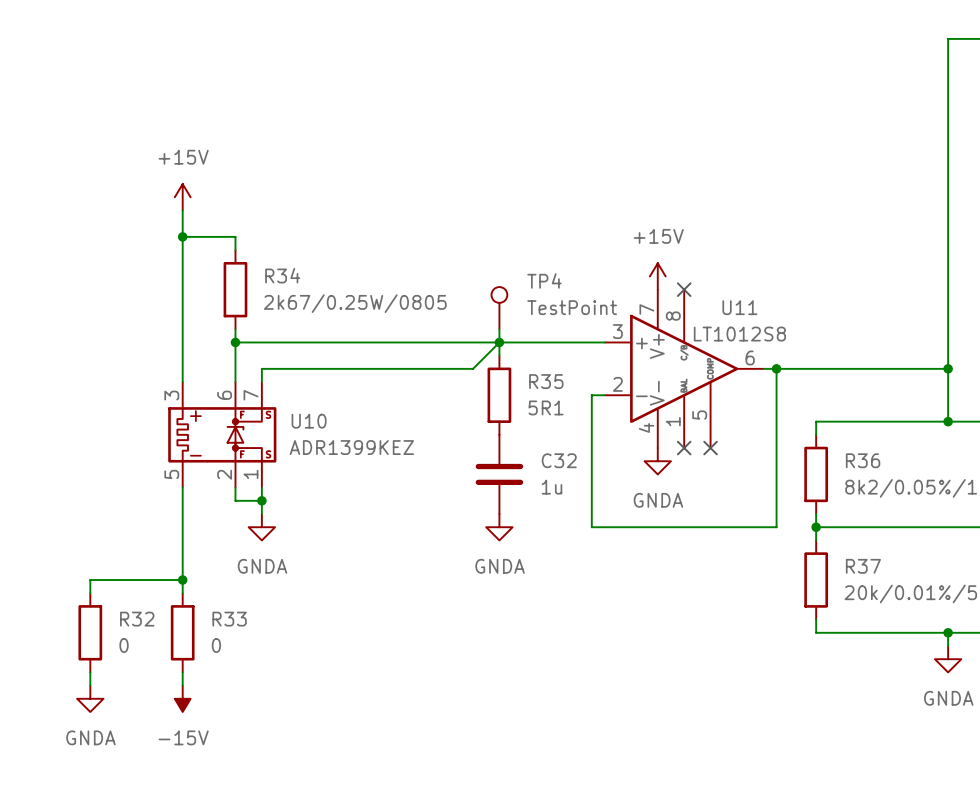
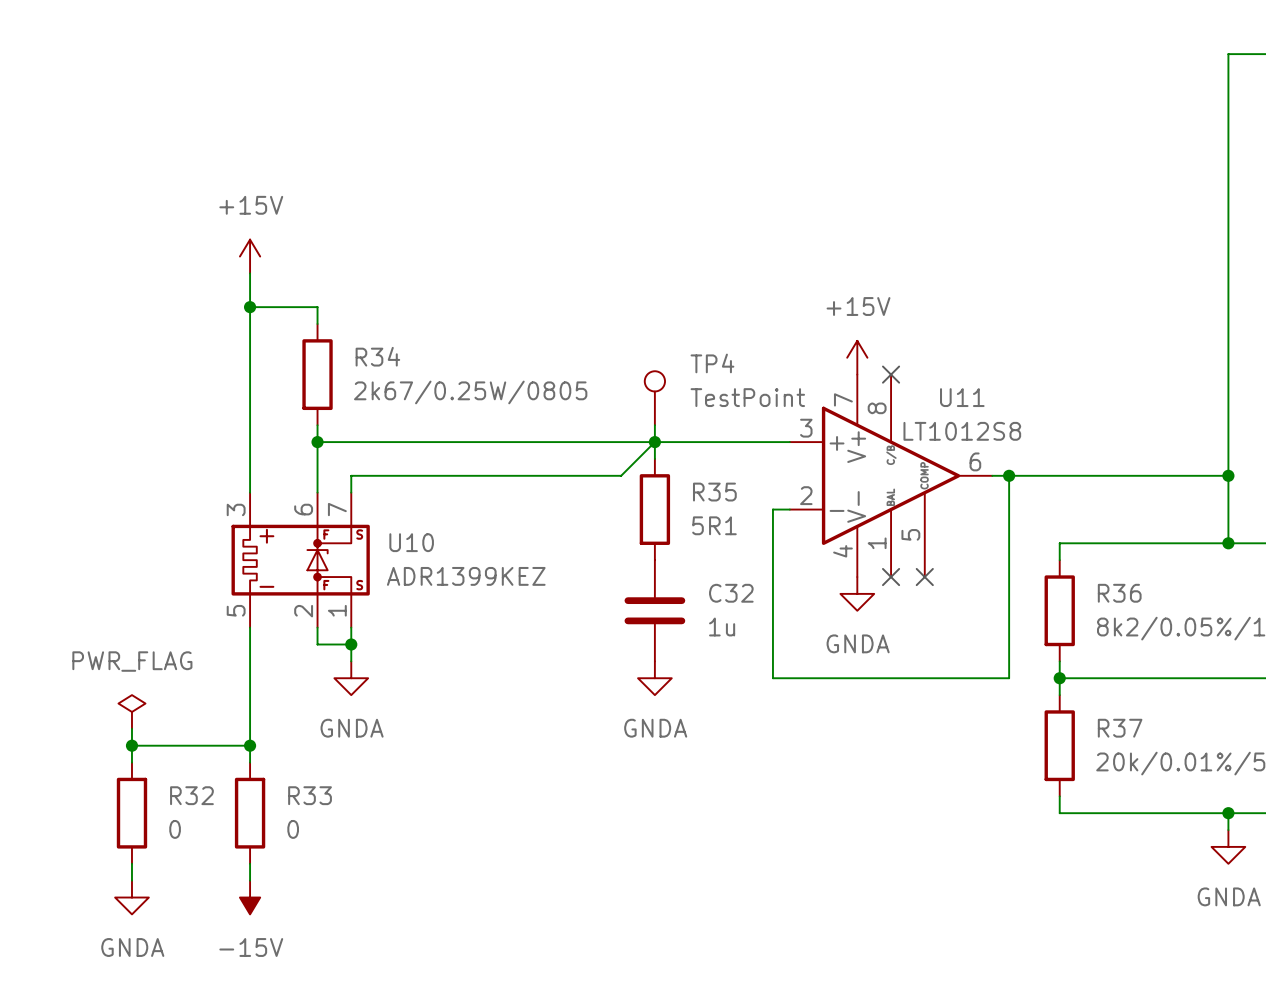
power symbol: none -> PWR_FLAG (131, 711)
wire: none -> (131, 728) (131, 745)
junction: none -> (131, 745)

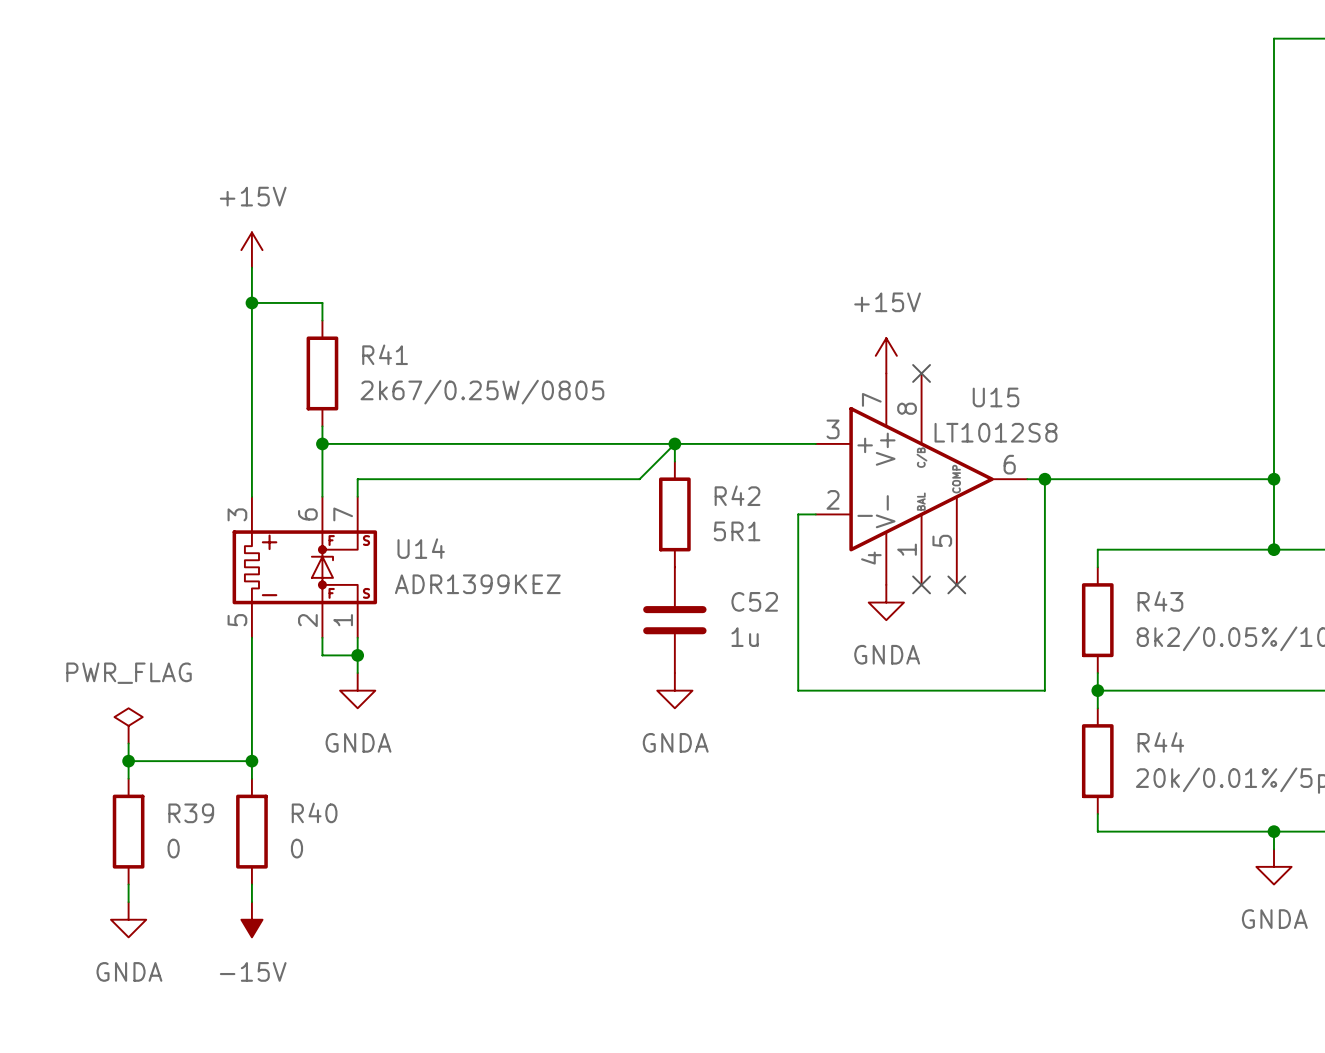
R34 name: R34 (377, 356) -> R41 (385, 354)
U11 name: U11 (962, 397) -> U15 (995, 397)
TP4: TestPoint (654, 398) -> none
wire: (654, 425) (654, 442) -> none
R35 name: R35 (714, 492) -> R42 (737, 495)
U10 name: U10 (411, 542) -> U14 (421, 548)
C32 name: C32 (731, 593) -> C52 (754, 601)
R36 name: R36 (1119, 593) -> R43 (1160, 601)
R37 name: R37 (1120, 728) -> R44 (1160, 742)
R32 name: R32 (191, 795) -> R39 (191, 813)
R33 name: R33 (310, 795) -> R40 (314, 812)

